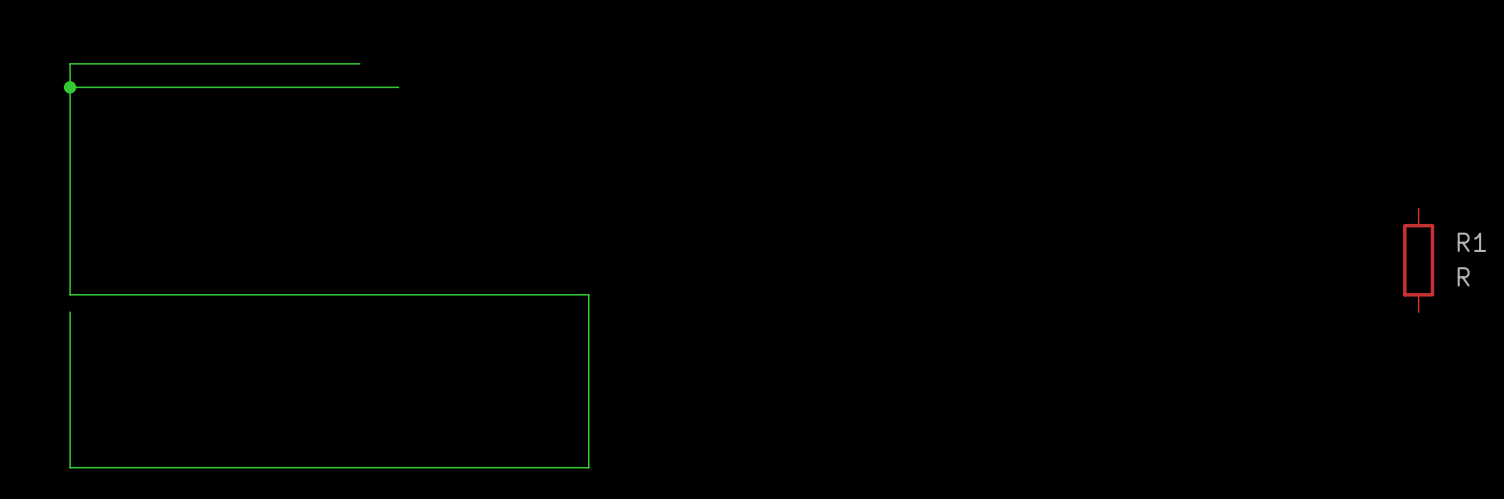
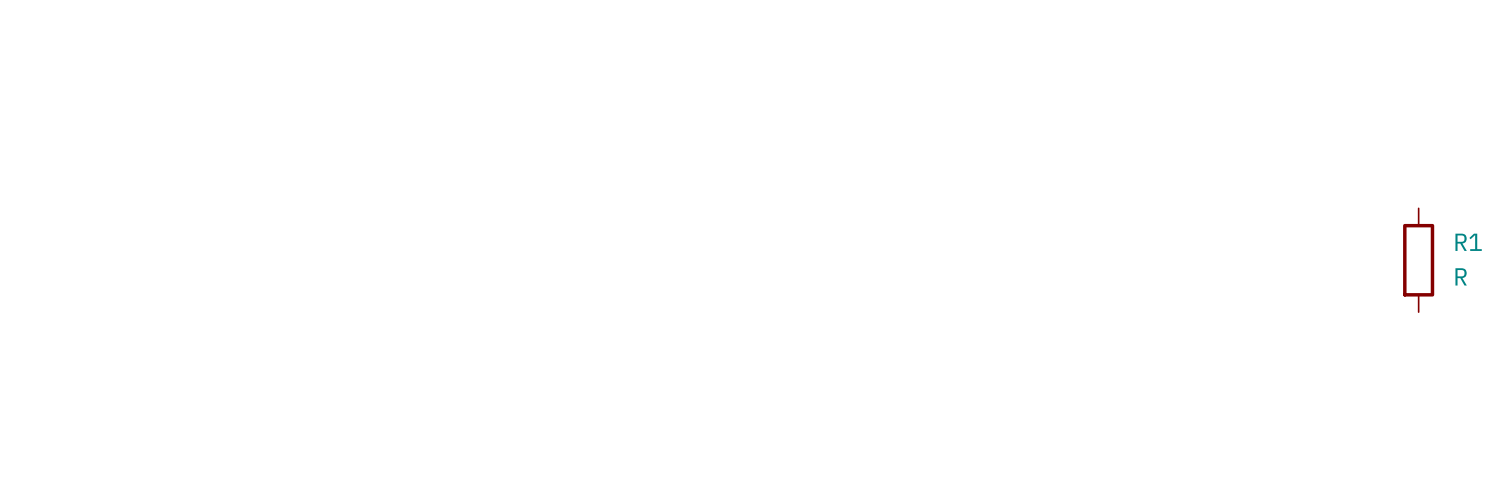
wire: (359, 63) (70, 63) (70, 294) (588, 294) (588, 467) (70, 467) (70, 312) -> none
wire: (70, 87) (398, 87) -> none
junction: (70, 87) -> none

